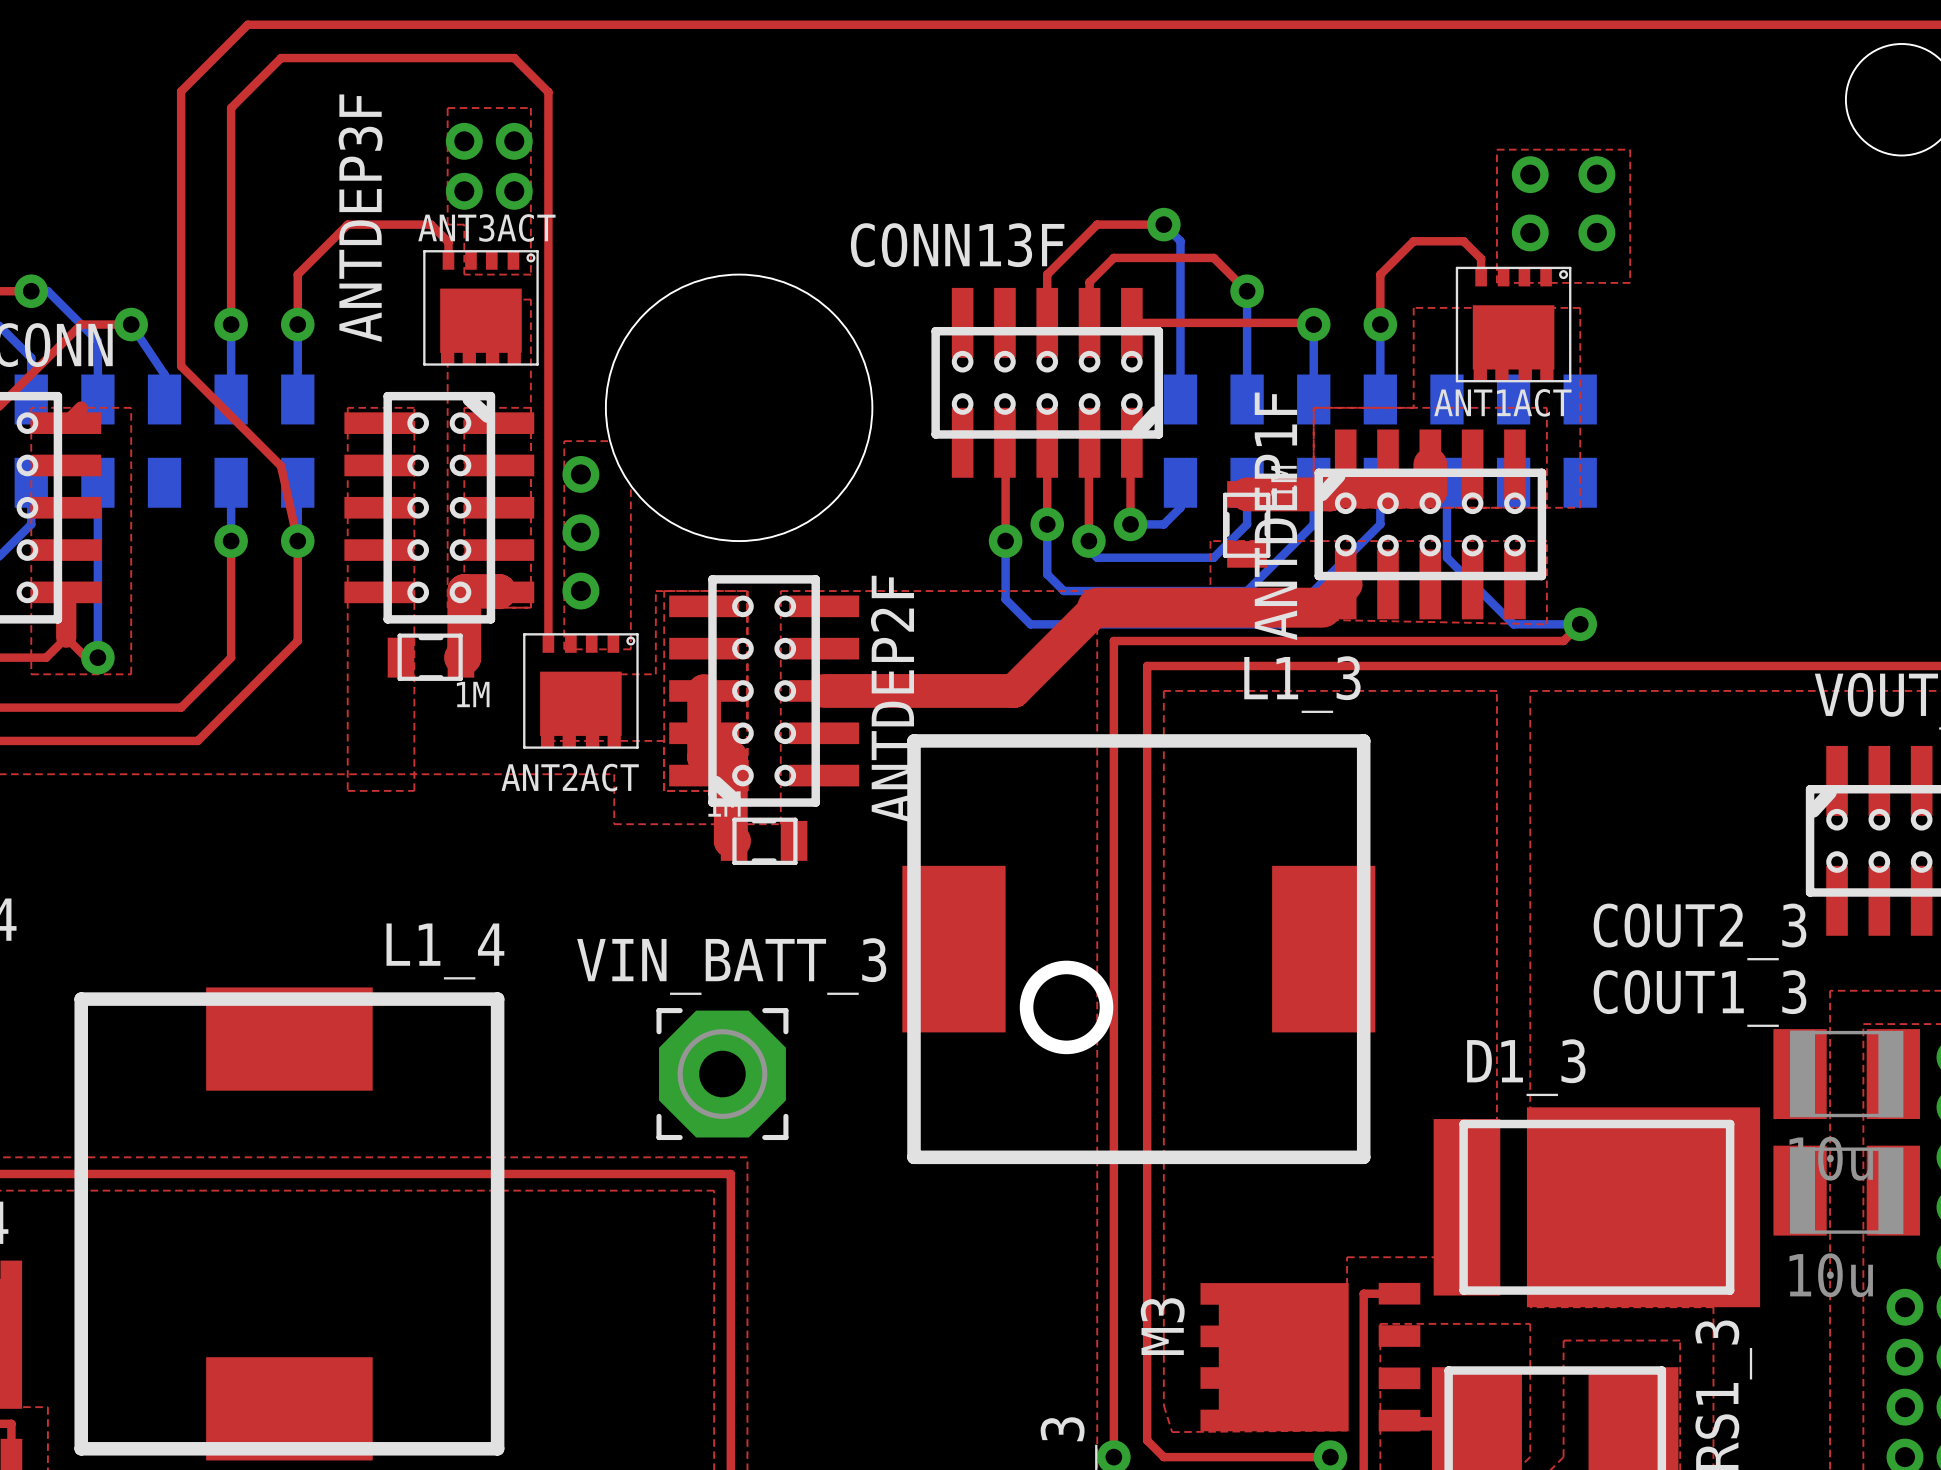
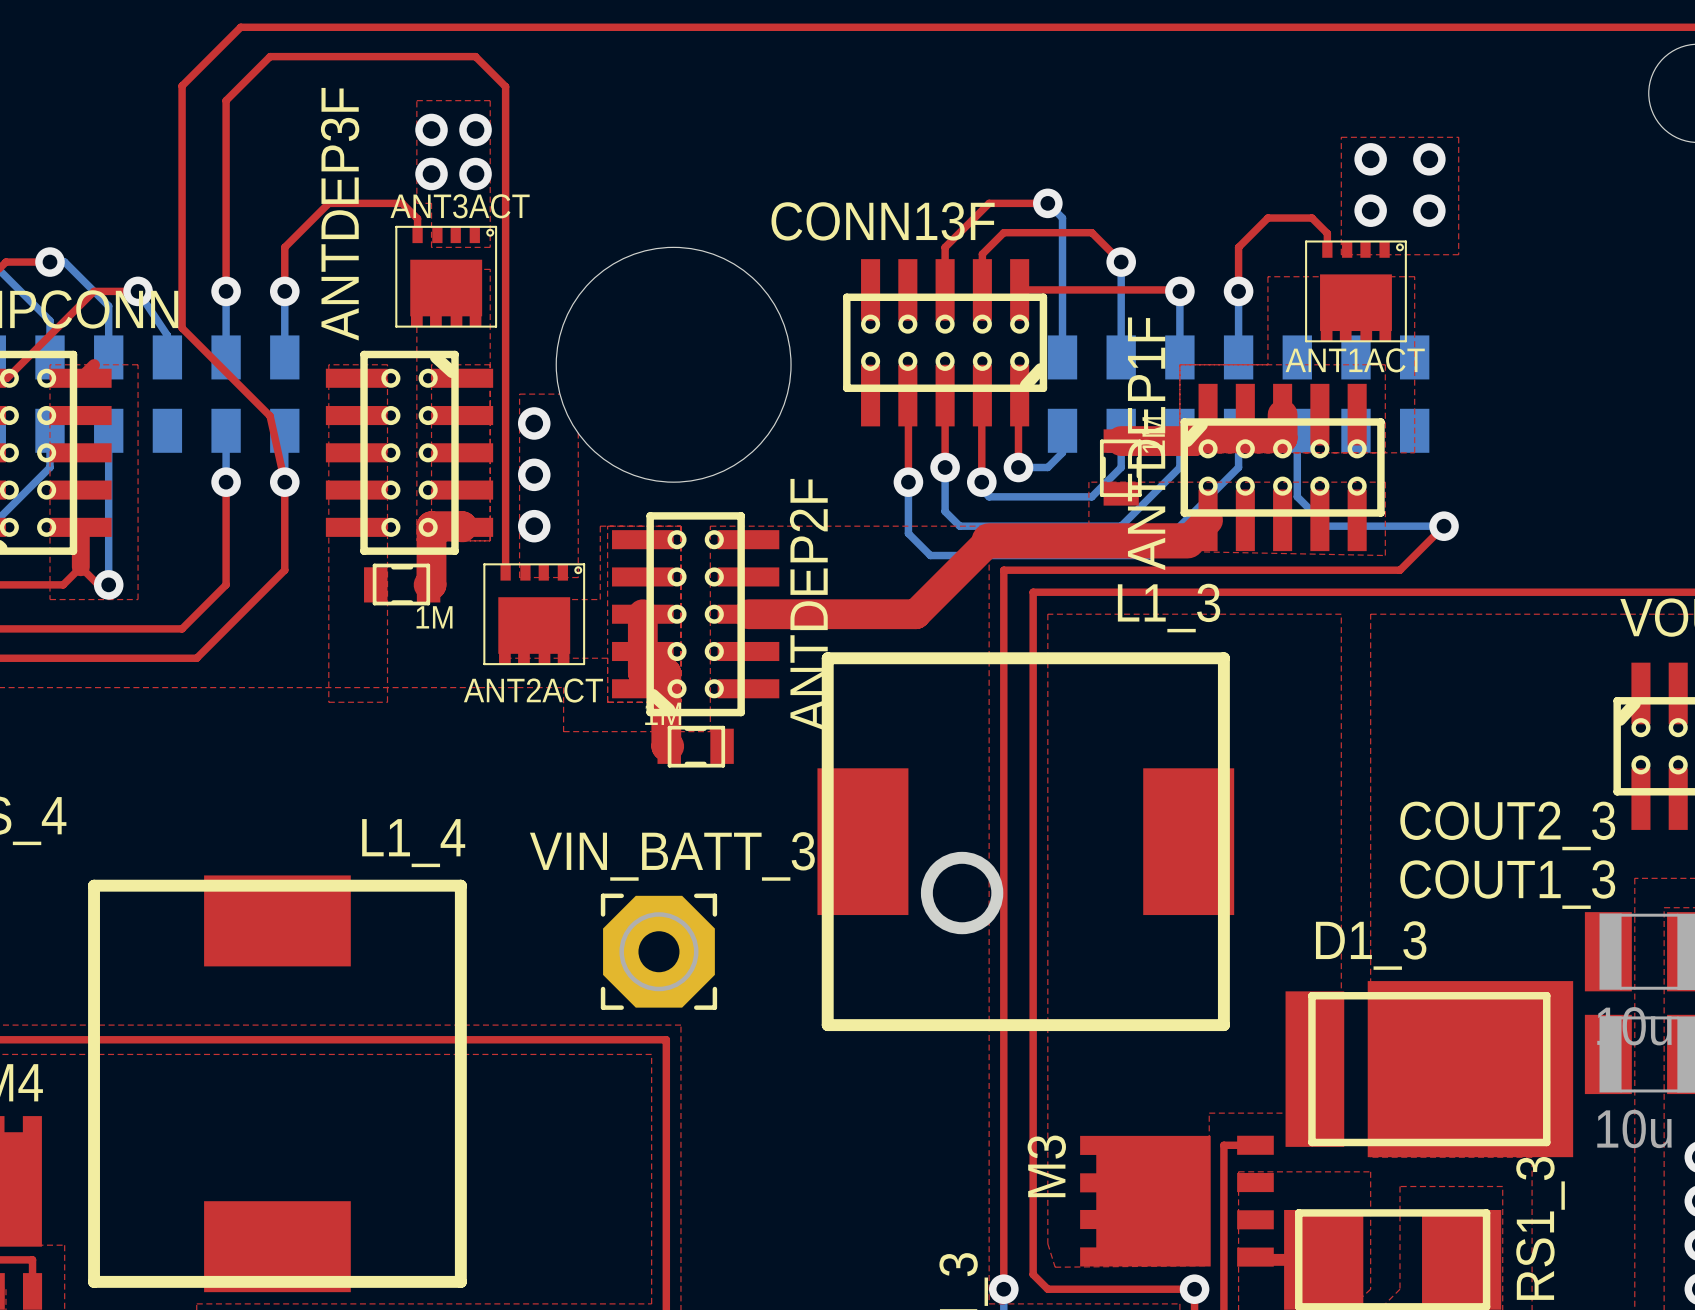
bottom track: (1480, 591) (1513, 624) (1580, 624) -> (1326, 526) (1444, 526)
top track: none -> (1444, 526) (1414, 555)
via position: (1580, 624) -> (1444, 526)

